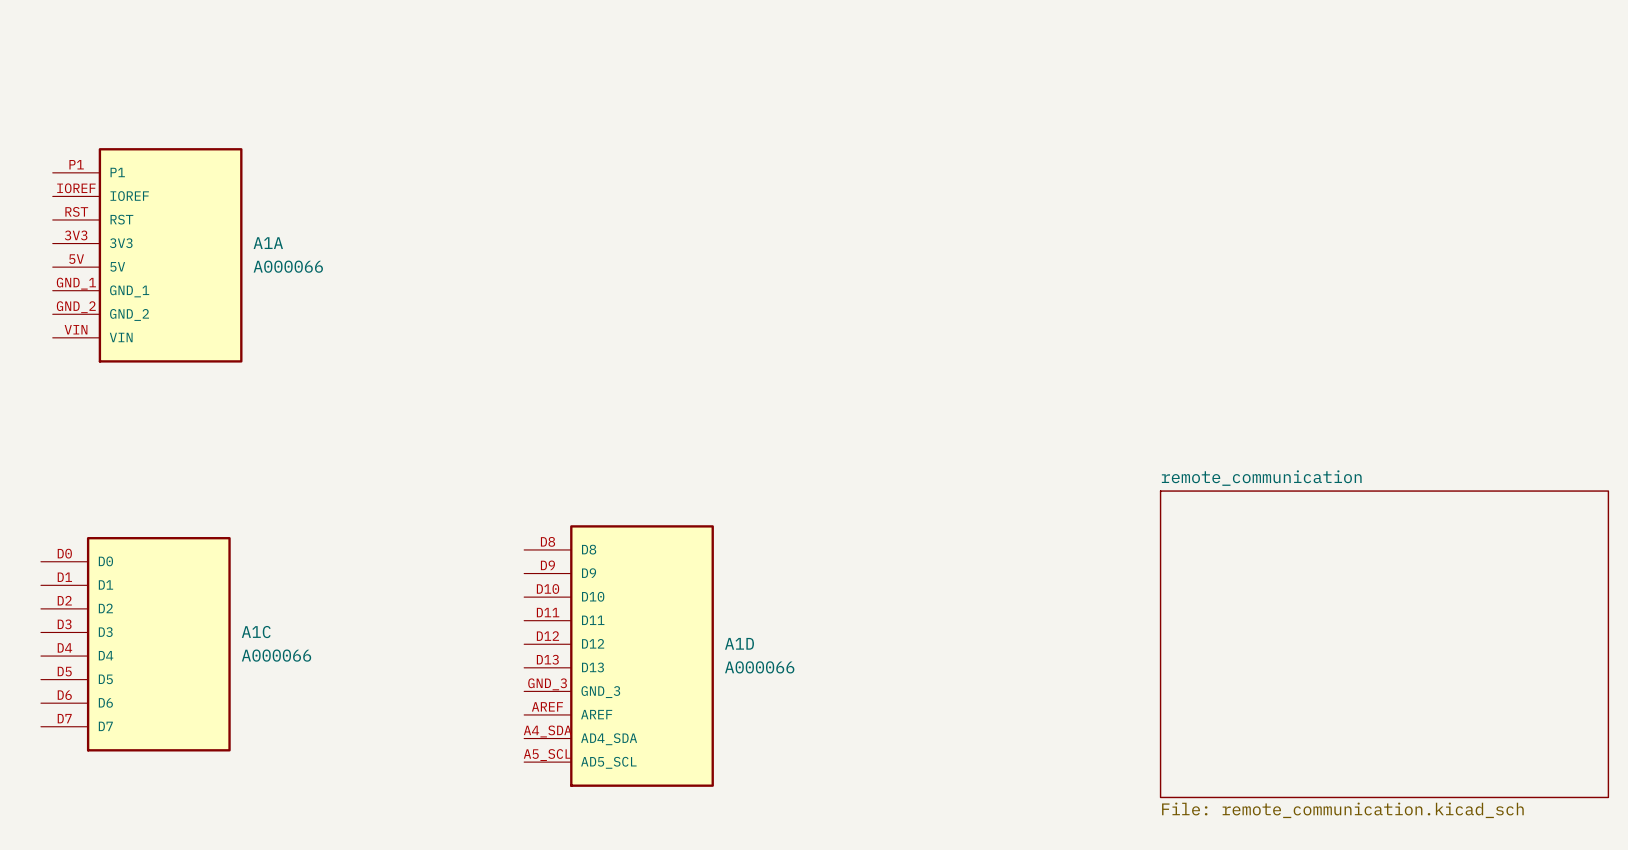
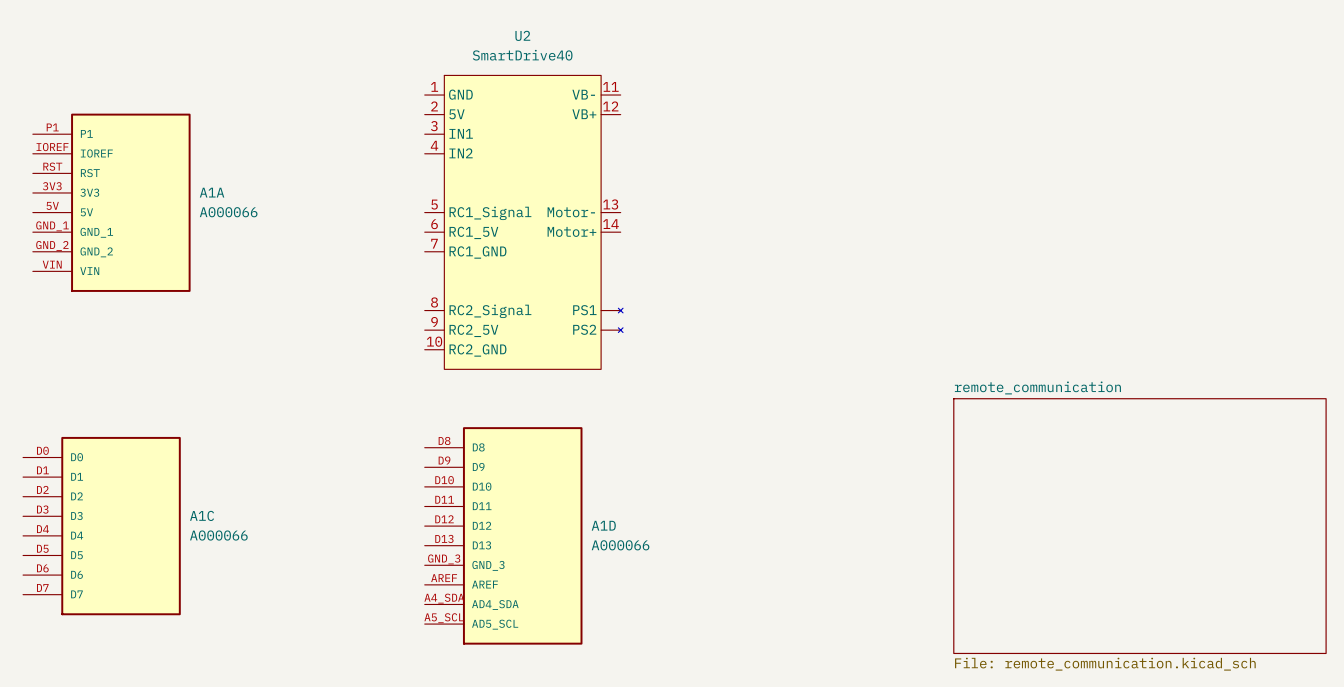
U2: none -> SmartDrive40 (523, 222)

